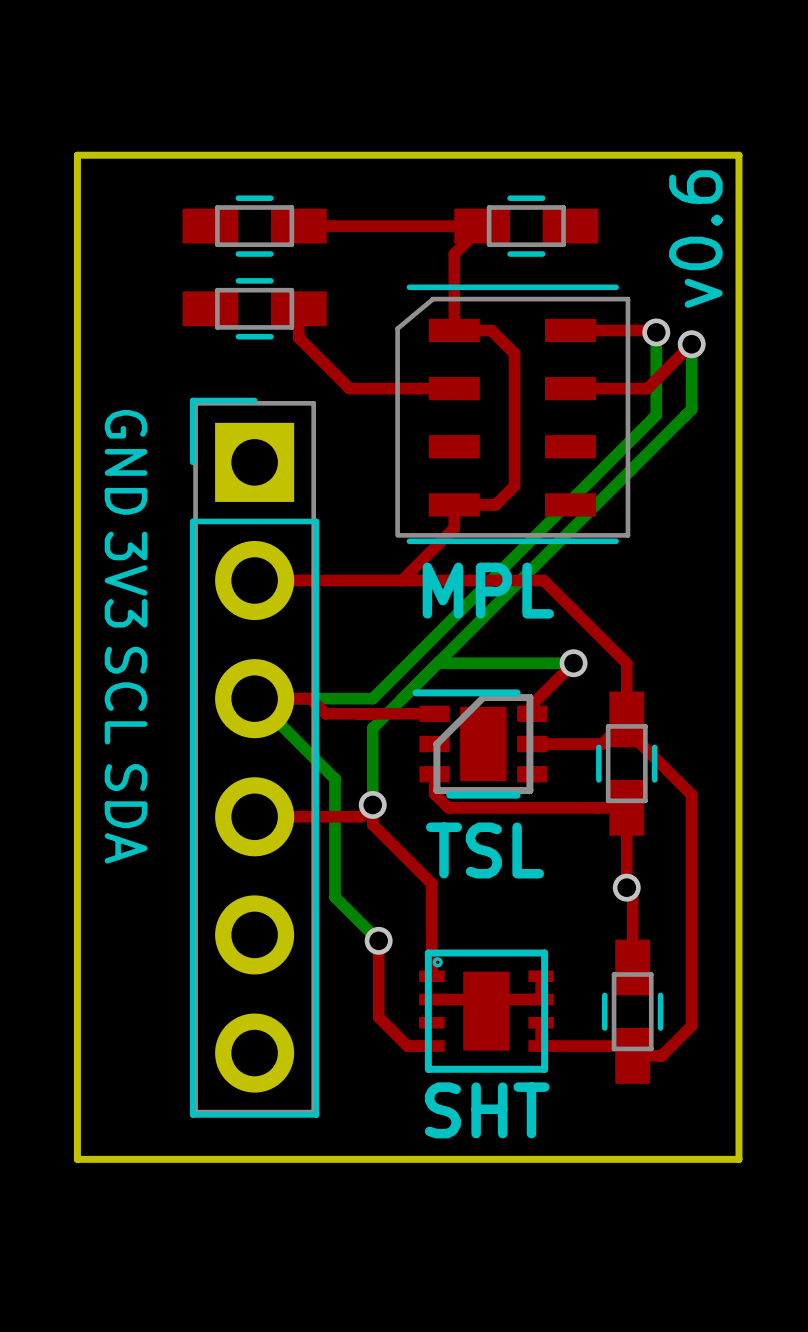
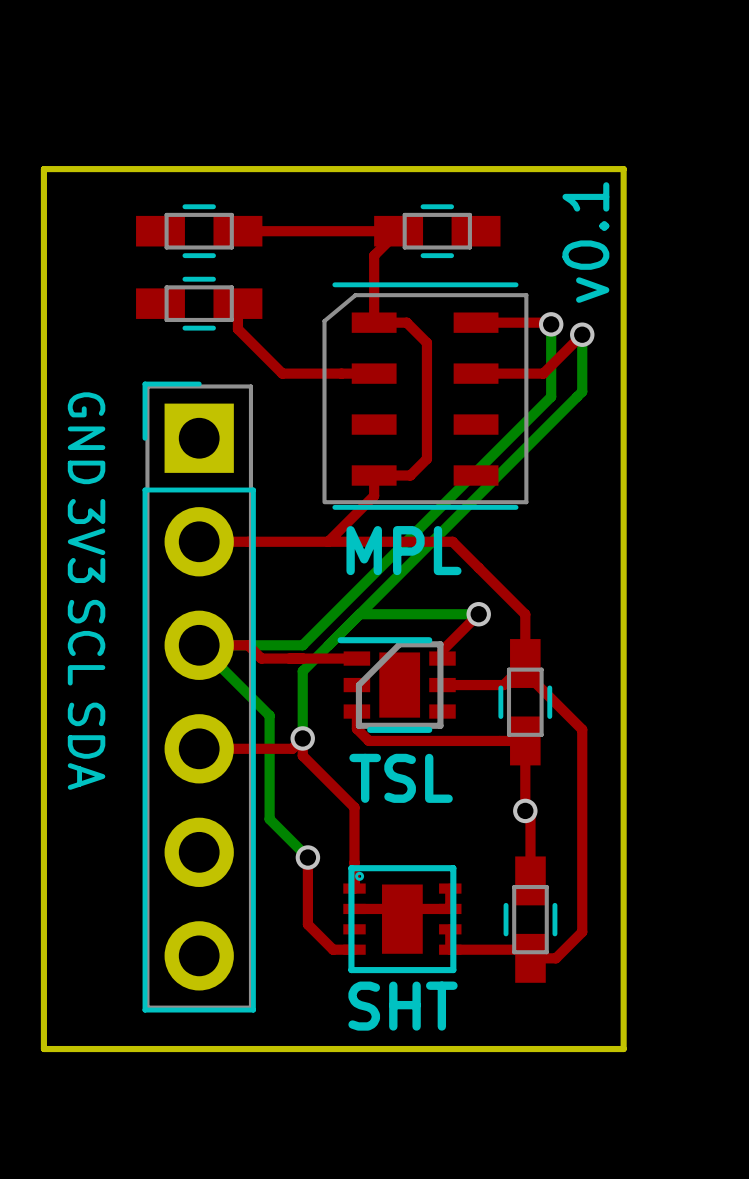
text: v0.6 (695, 239) -> v0.1 (585, 242)

